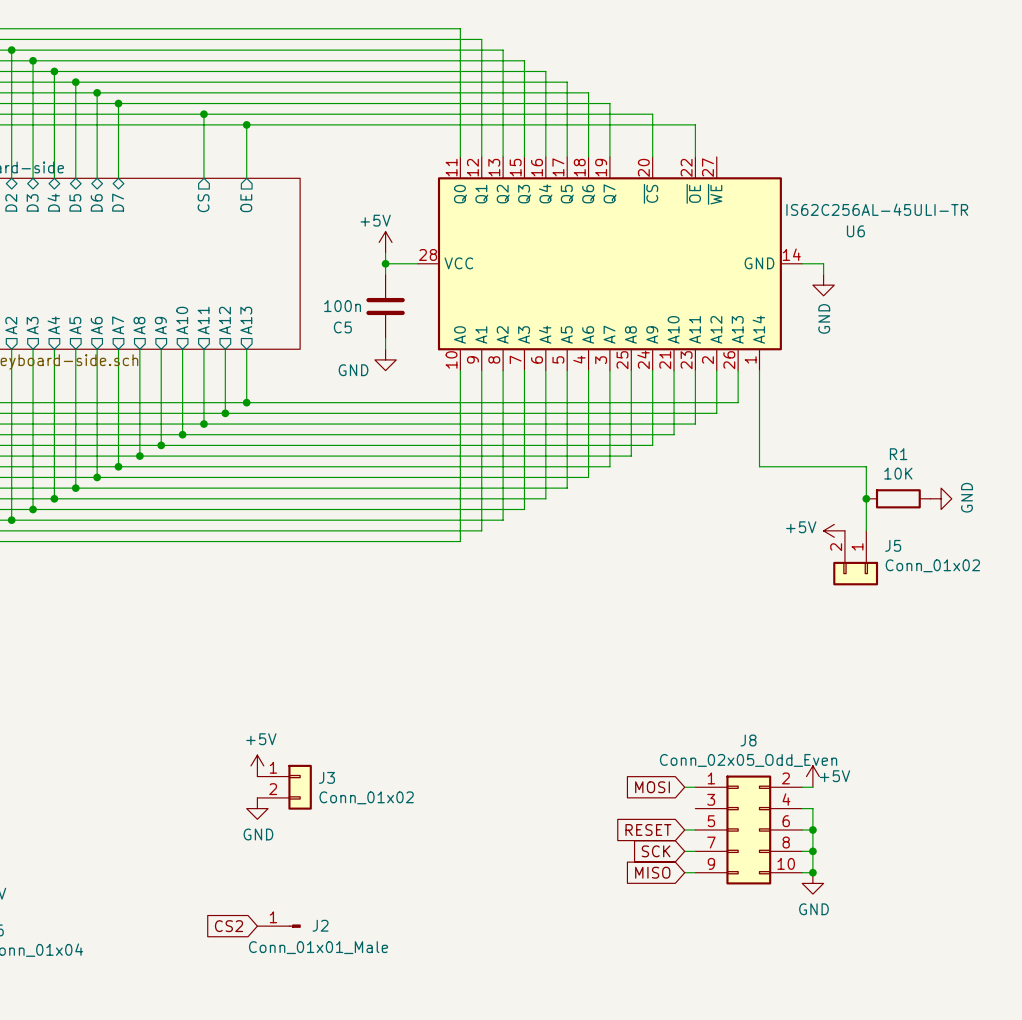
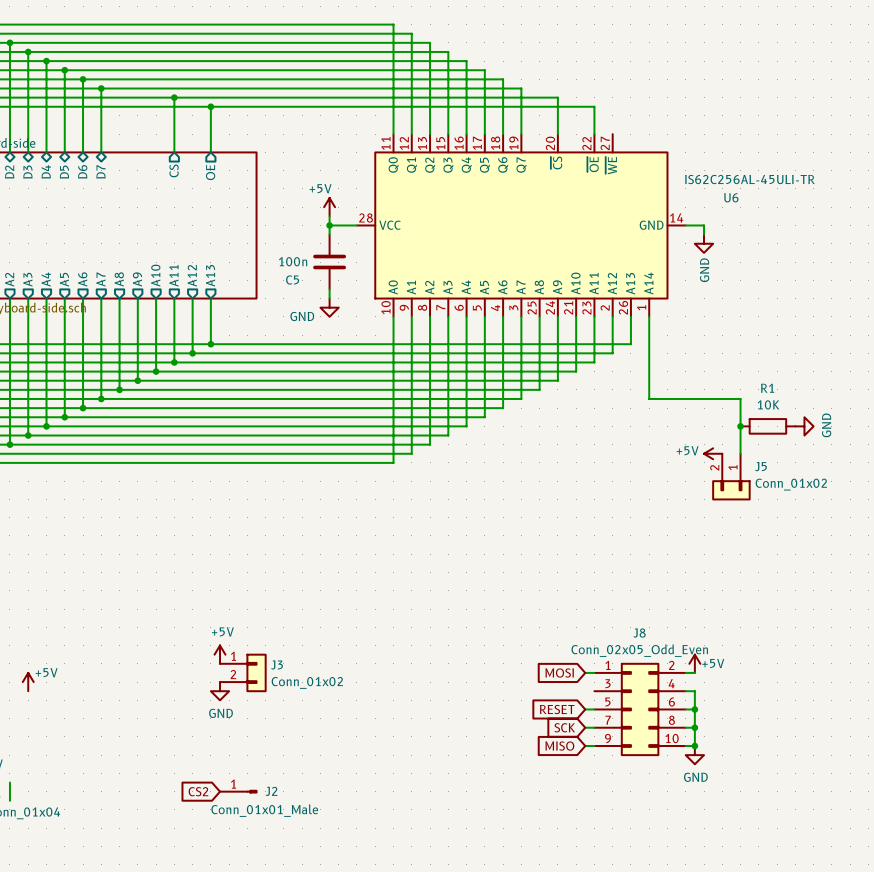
power symbol: none -> +5V (28, 682)
wire: none -> (9, 782) (9, 800)

